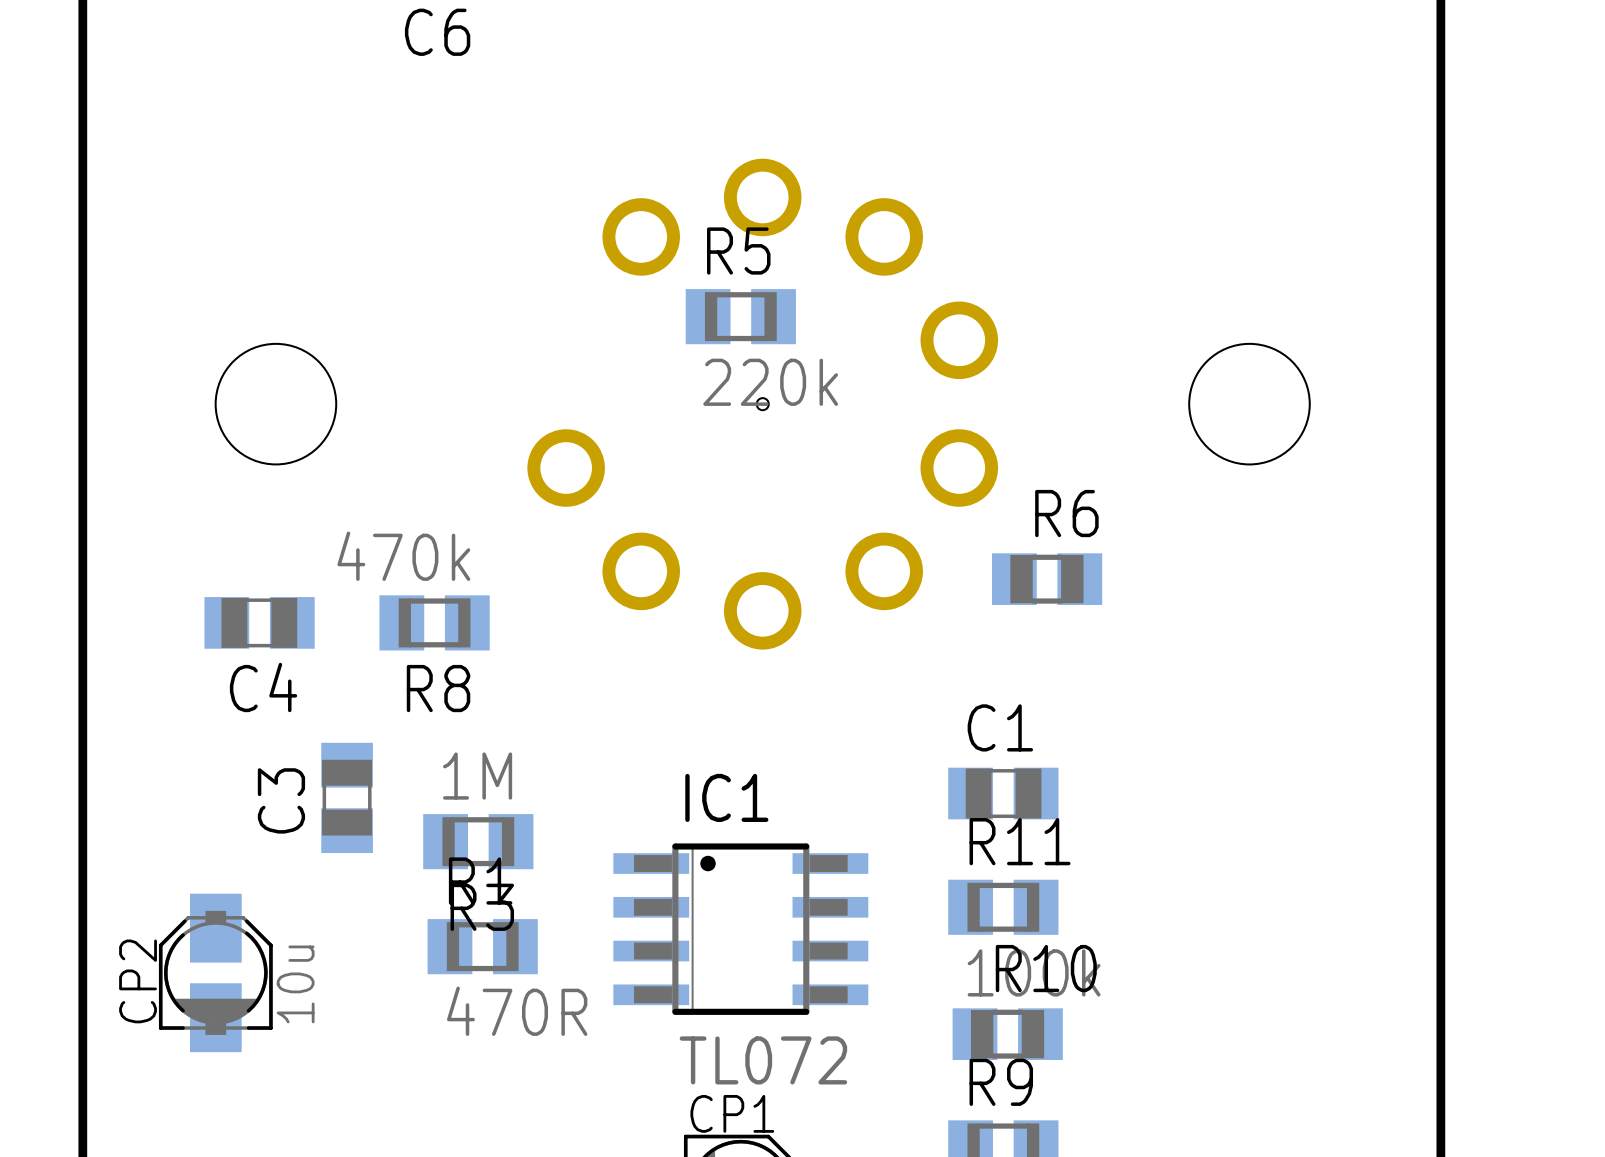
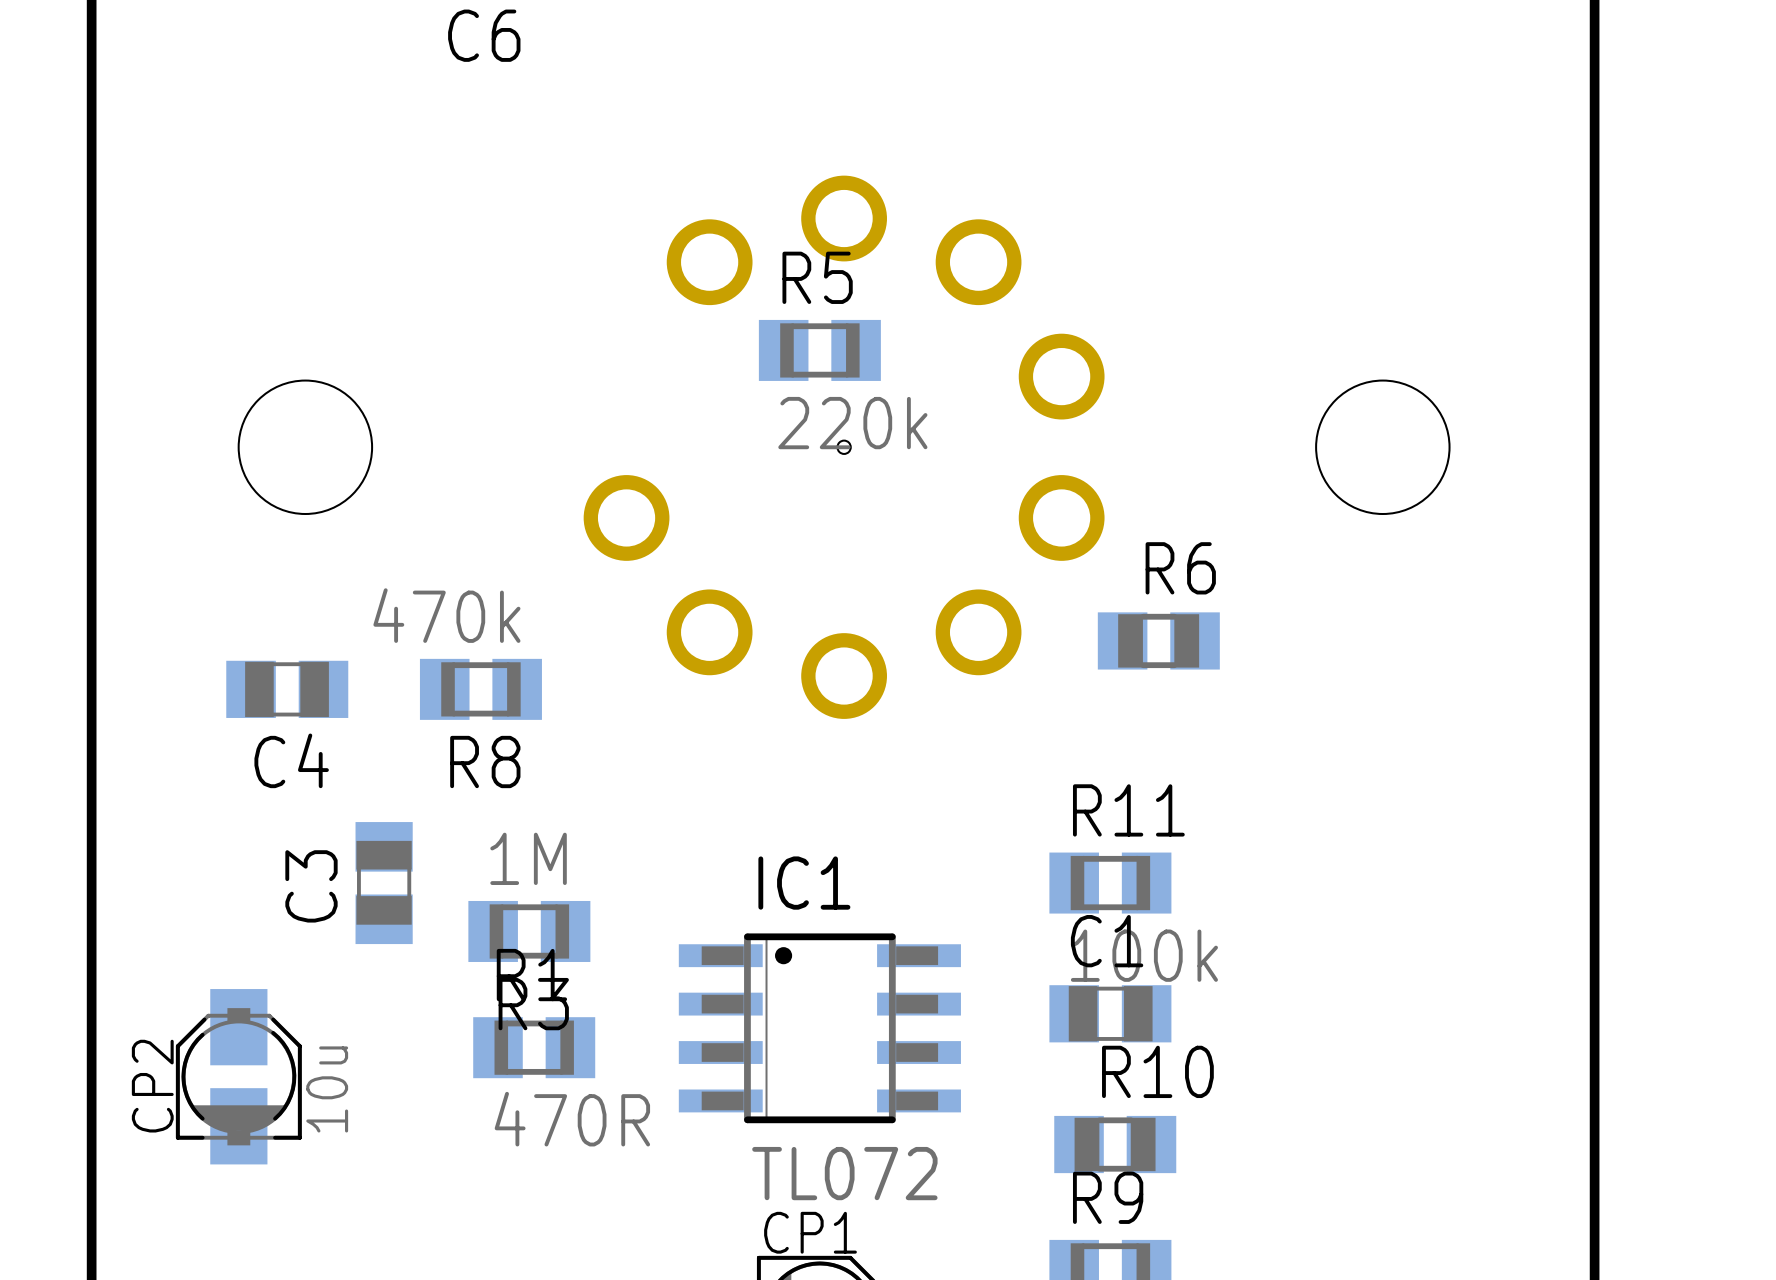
C1 position: (1003, 793) -> (1110, 1013)
R11 position: (1003, 907) -> (1110, 883)

